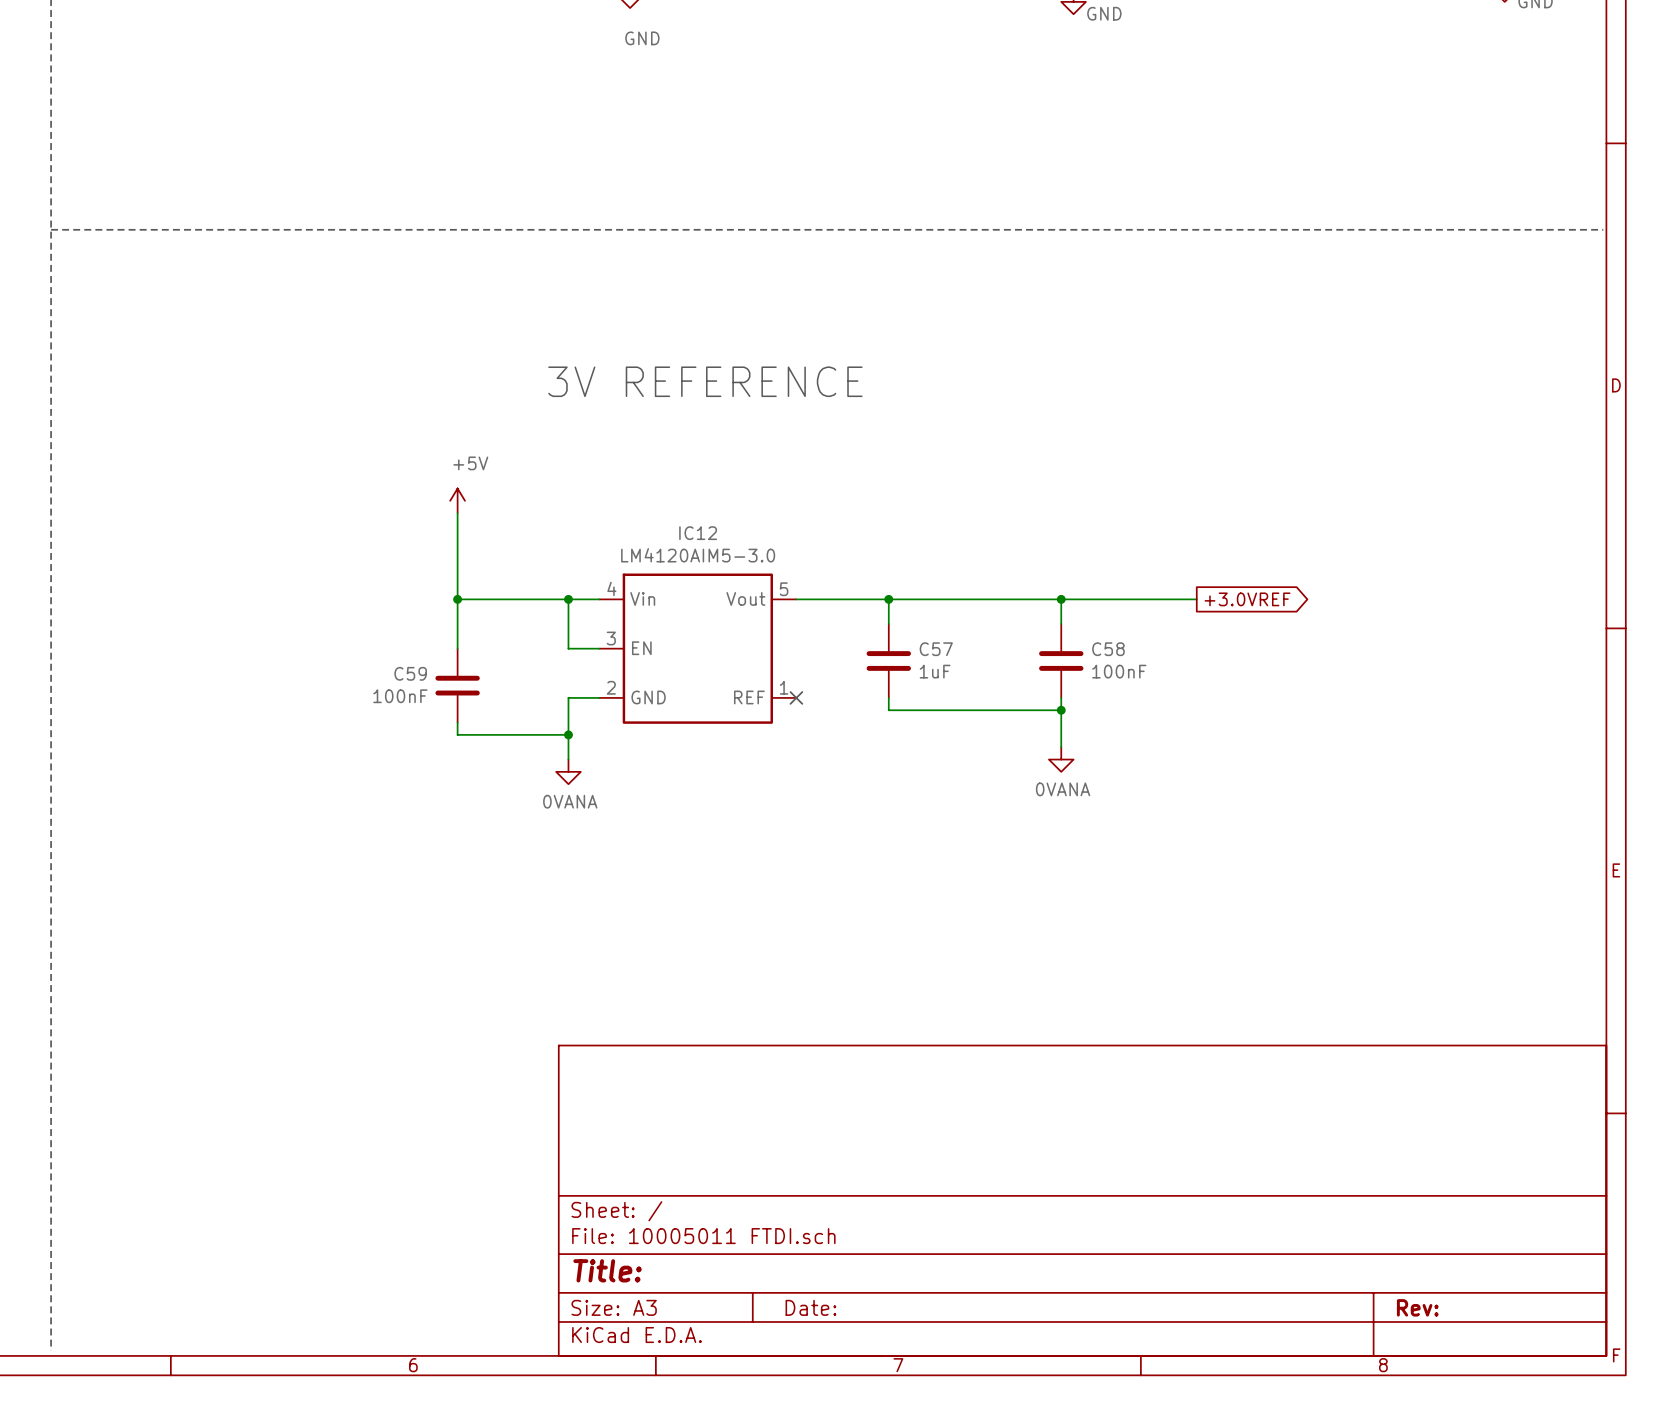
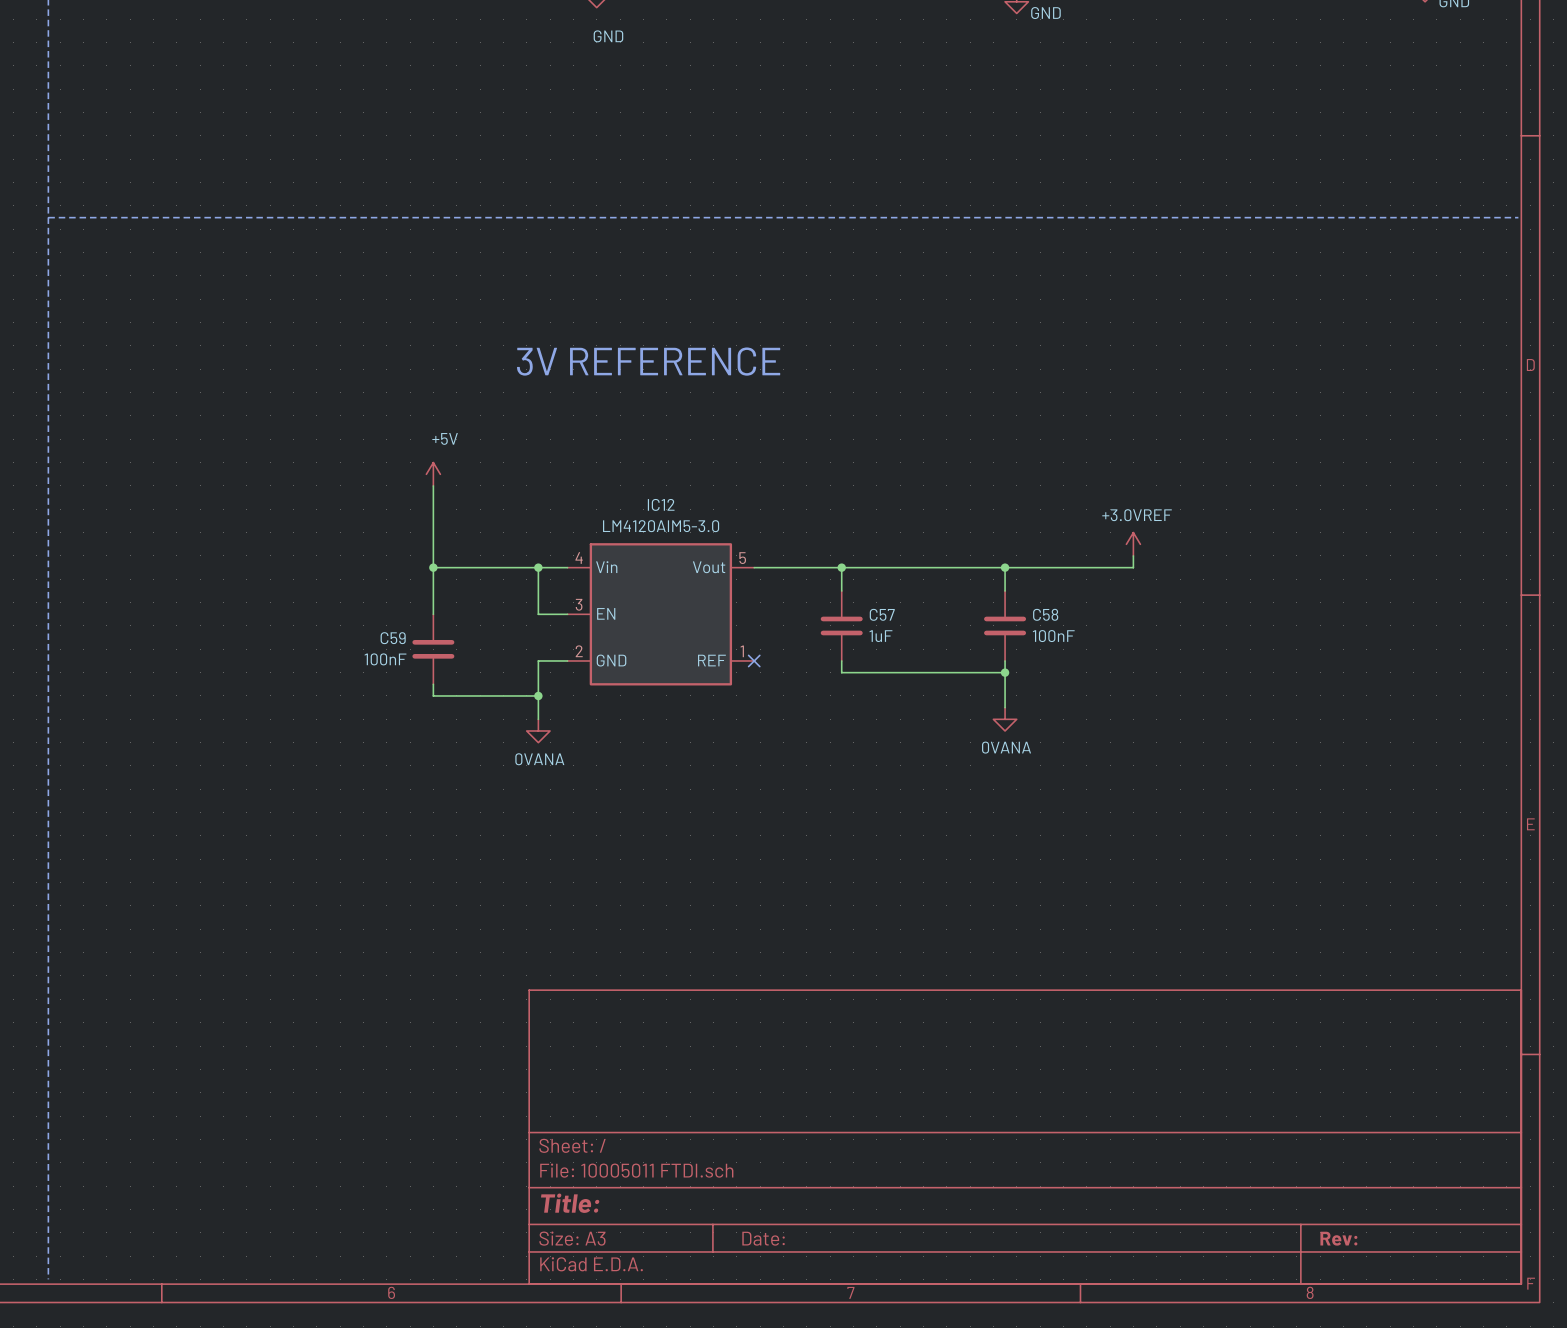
power symbol: none -> +3.0VREF (1133, 544)
global label: +3.0VREF (1247, 599) -> none

